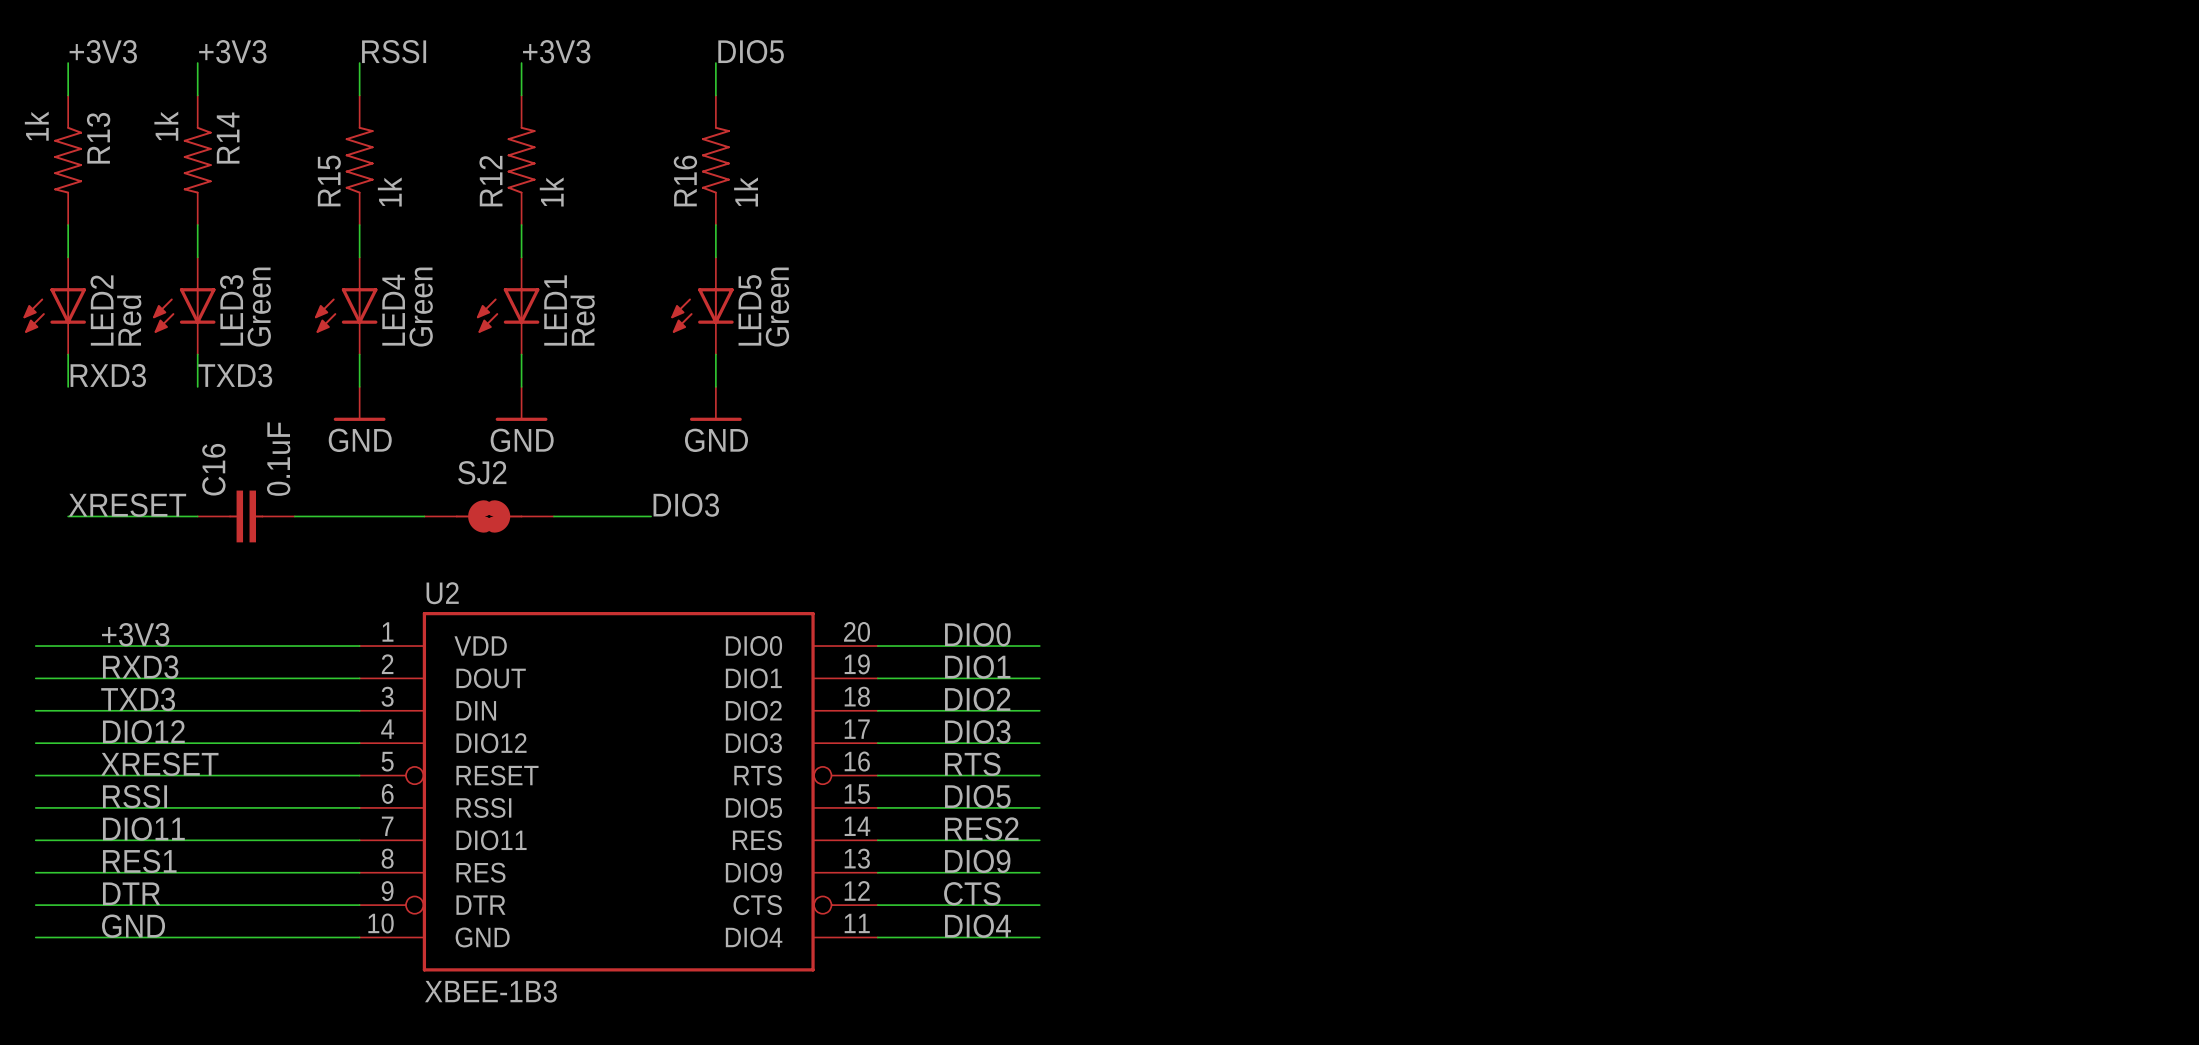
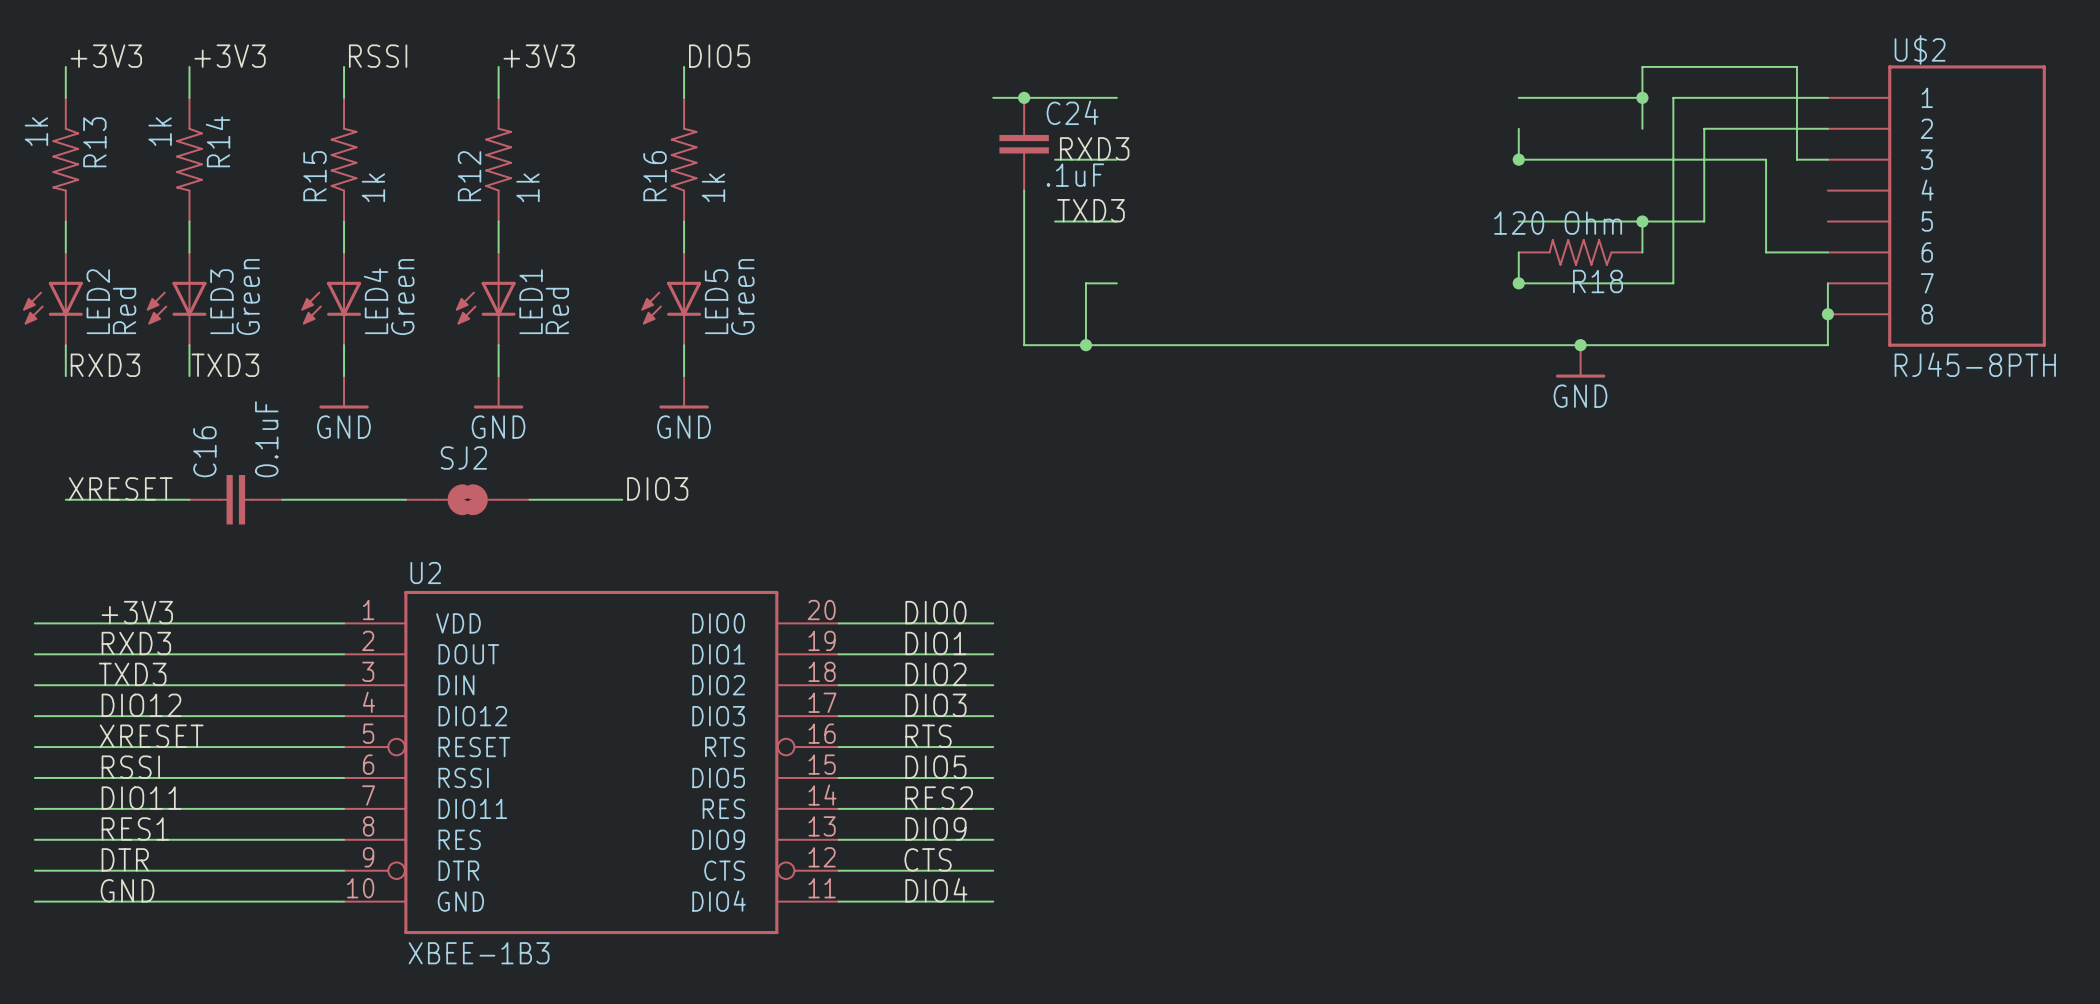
wire: none -> (993, 97) (1116, 97)
junction: none -> (1024, 97)
wire: none -> (1518, 97) (1642, 97)
junction: none -> (1642, 97)
wire: none -> (1827, 97) (1673, 97) (1673, 283) (1518, 283) (1518, 252)
wire: none -> (1518, 128) (1518, 159) (1766, 159) (1766, 252) (1827, 252)
wire: none -> (1642, 128) (1642, 66) (1796, 66) (1796, 159) (1827, 159)
wire: none -> (1827, 128) (1704, 128) (1704, 221) (1518, 221)
C24: none -> .1uF (1024, 144)
label: none -> RXD3 (1094, 148)
wire: none -> (1055, 159) (1116, 159)
junction: none -> (1518, 159)
wire: none -> (1024, 190) (1024, 345) (1827, 345) (1827, 283)
U$2: none -> RJ45-8PTH (1936, 206)
label: none -> TXD3 (1090, 210)
wire: none -> (1055, 221) (1116, 221)
wire: none -> (1642, 221) (1642, 252)
junction: none -> (1642, 221)
R18: none -> 120 Ohm (1580, 252)
wire: none -> (1116, 283) (1085, 283) (1085, 345)
junction: none -> (1518, 283)
junction: none -> (1827, 314)
junction: none -> (1085, 345)
junction: none -> (1580, 345)
power symbol: none -> GND (1580, 361)

